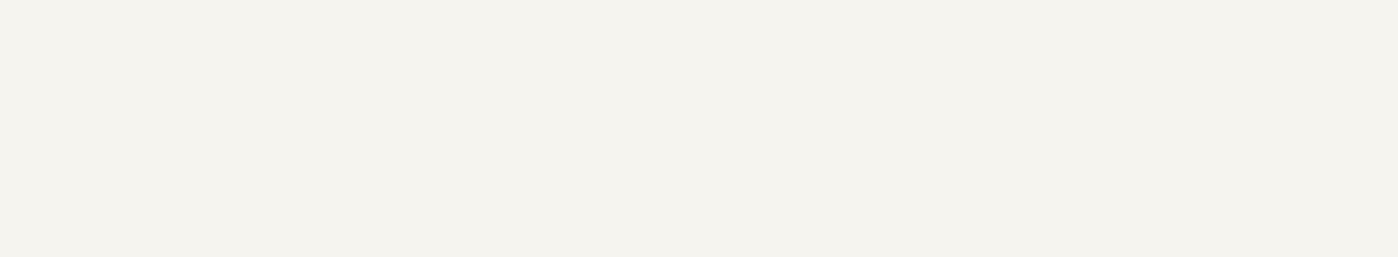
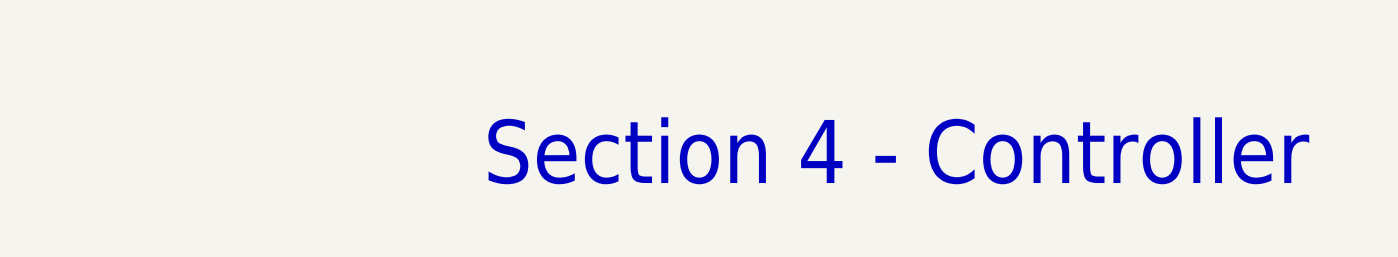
text: none -> Section 4 - Controller (898, 150)

